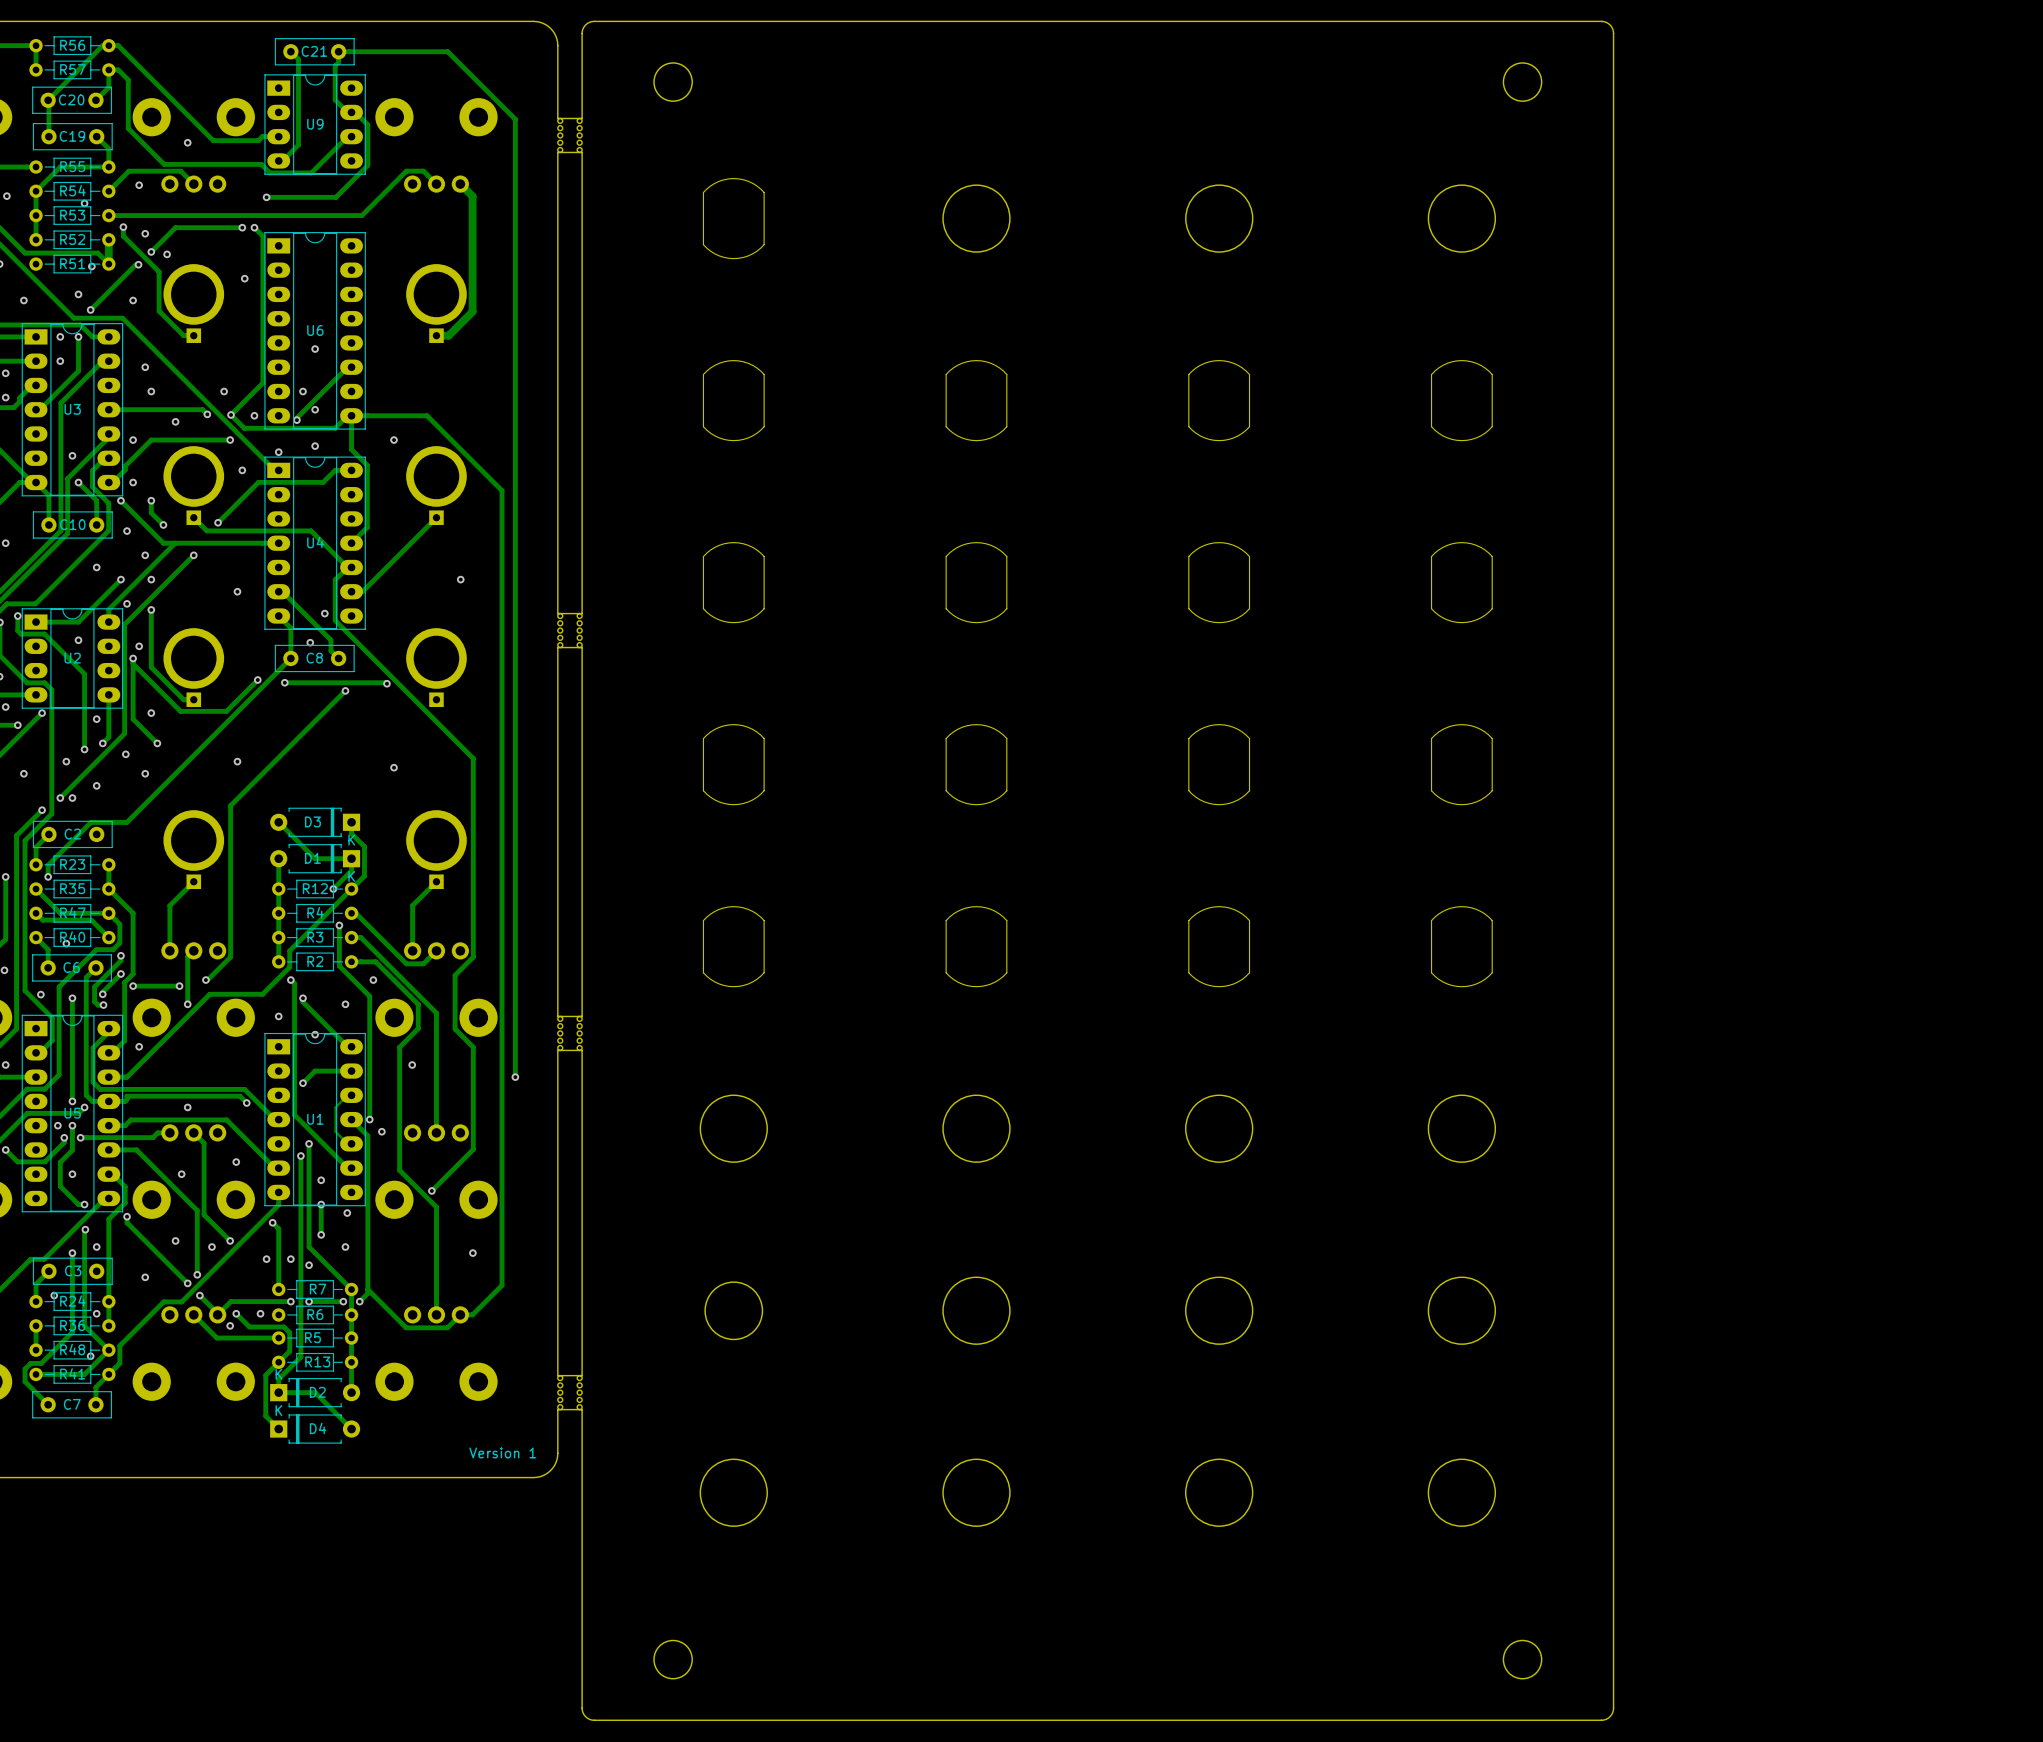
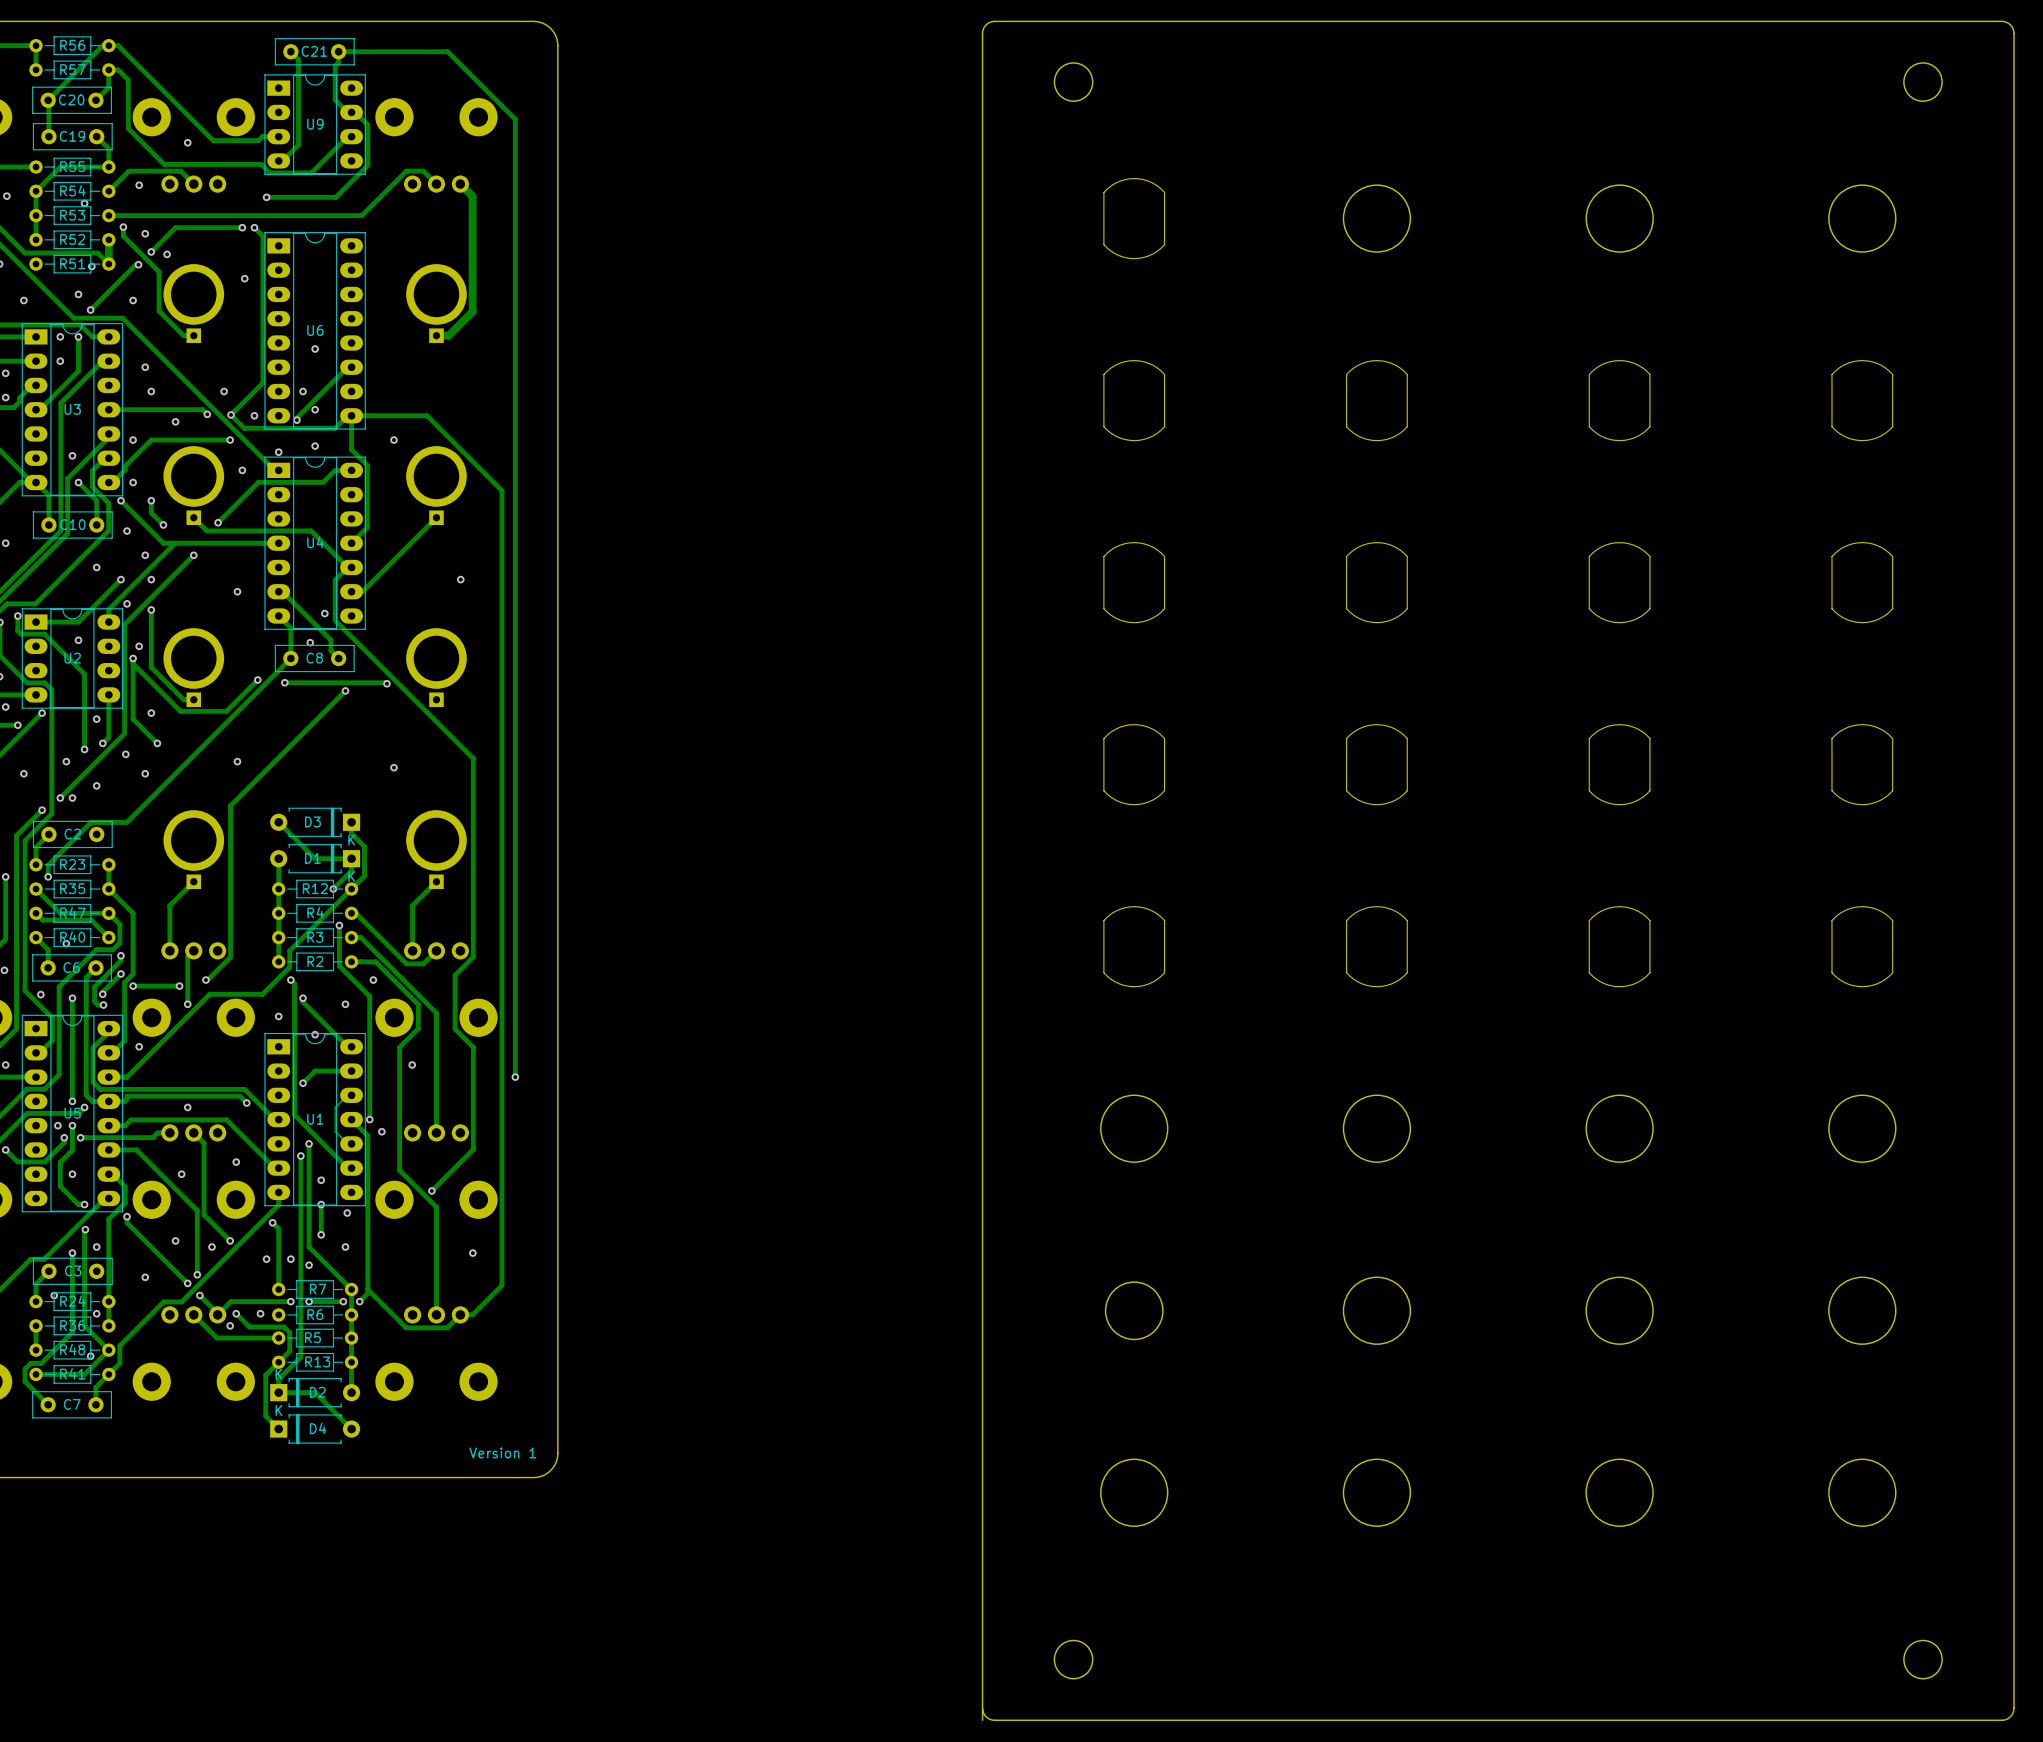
board edge: (994, 21) (591, 21) (584, 26) (582, 31) (582, 118) (557, 118) -> (557, 152) (557, 118)
board edge: none -> (994, 21) (986, 24) (982, 33) (982, 1720)
board edge: (1601, 21) (1610, 24) (1613, 33) (1613, 1708) (1610, 1716) (1601, 1720) -> (1601, 21) (2001, 21) (2010, 24) (2014, 33) (2013, 1711) (2009, 1717) (2001, 1720) (1601, 1720)
round board edge: [653, 62, 693, 102] -> none
round board edge: none -> [1053, 62, 1094, 102]
round board edge: [1502, 62, 1543, 102] -> none
round board edge: none -> [1903, 62, 1943, 102]
round board edge: [557, 117, 564, 125] -> none
round board edge: [576, 117, 583, 125] -> none
round board edge: [557, 125, 564, 132] -> none
round board edge: [576, 125, 583, 132] -> none
round board edge: [557, 132, 564, 139] -> none
round board edge: [576, 132, 583, 139] -> none
round board edge: [557, 139, 564, 146] -> none
round board edge: [576, 139, 583, 146] -> none
round board edge: [557, 146, 564, 154] -> none
round board edge: [576, 146, 583, 154] -> none
board edge: (557, 152) (582, 152) (582, 613) (557, 613) -> none
drawing: [703, 178, 765, 259] -> none
drawing: none -> [1103, 178, 1165, 259]
round board edge: [942, 184, 1011, 253] -> none
round board edge: [1185, 184, 1254, 253] -> none
round board edge: none -> [1342, 184, 1412, 253]
round board edge: [1427, 184, 1497, 253] -> none
round board edge: none -> [1585, 184, 1654, 253]
round board edge: none -> [1828, 184, 1897, 253]
drawing: [703, 360, 765, 441] -> none
drawing: [946, 360, 1007, 441] -> none
drawing: none -> [1103, 360, 1165, 441]
drawing: [1188, 360, 1250, 441] -> none
drawing: none -> [1346, 360, 1408, 441]
drawing: [1431, 360, 1493, 441] -> none
drawing: none -> [1589, 360, 1651, 441]
drawing: none -> [1831, 360, 1893, 441]
drawing: [703, 542, 765, 623] -> none
drawing: [946, 542, 1007, 623] -> none
drawing: none -> [1103, 542, 1165, 623]
drawing: [1188, 542, 1250, 623] -> none
drawing: none -> [1346, 542, 1408, 623]
drawing: [1431, 542, 1493, 623] -> none
drawing: none -> [1589, 542, 1651, 623]
drawing: none -> [1831, 542, 1893, 623]
round board edge: [557, 612, 564, 620] -> none
round board edge: [576, 612, 583, 620] -> none
round board edge: [557, 620, 564, 627] -> none
round board edge: [576, 620, 583, 627] -> none
round board edge: [557, 627, 564, 634] -> none
round board edge: [576, 627, 583, 634] -> none
round board edge: [557, 634, 564, 641] -> none
round board edge: [576, 634, 583, 641] -> none
round board edge: [557, 641, 564, 649] -> none
round board edge: [576, 641, 583, 649] -> none
board edge: (557, 647) (582, 647) (582, 1016) (557, 1016) -> (557, 647) (557, 613)
drawing: [703, 724, 765, 805] -> none
drawing: [946, 724, 1007, 805] -> none
drawing: none -> [1103, 724, 1165, 805]
drawing: [1188, 724, 1250, 805] -> none
drawing: none -> [1346, 724, 1408, 805]
drawing: [1431, 724, 1493, 805] -> none
drawing: none -> [1589, 724, 1651, 805]
drawing: none -> [1831, 724, 1893, 805]
drawing: [703, 906, 765, 987] -> none
drawing: [946, 906, 1007, 987] -> none
drawing: none -> [1103, 906, 1165, 987]
drawing: [1188, 906, 1250, 987] -> none
drawing: none -> [1346, 906, 1408, 987]
drawing: [1431, 906, 1493, 987] -> none
drawing: none -> [1589, 906, 1651, 987]
drawing: none -> [1831, 906, 1893, 987]
round board edge: [557, 1015, 564, 1023] -> none
round board edge: [576, 1015, 583, 1023] -> none
round board edge: [557, 1023, 564, 1030] -> none
round board edge: [576, 1023, 583, 1030] -> none
round board edge: [557, 1030, 564, 1037] -> none
round board edge: [576, 1030, 583, 1037] -> none
round board edge: [557, 1037, 564, 1044] -> none
round board edge: [576, 1037, 583, 1044] -> none
round board edge: [557, 1044, 564, 1052] -> none
round board edge: [576, 1044, 583, 1052] -> none
board edge: (557, 1050) (582, 1050) (582, 1375) (557, 1375) -> (557, 1050) (557, 1016)
round board edge: [699, 1094, 768, 1163] -> none
round board edge: [942, 1094, 1011, 1163] -> none
round board edge: none -> [1100, 1094, 1169, 1163]
round board edge: [1185, 1094, 1254, 1163] -> none
round board edge: none -> [1342, 1094, 1412, 1163]
round board edge: [1427, 1094, 1497, 1163] -> none
round board edge: none -> [1585, 1094, 1654, 1163]
round board edge: none -> [1828, 1094, 1897, 1163]
round board edge: [942, 1276, 1011, 1345] -> none
round board edge: [1185, 1276, 1254, 1345] -> none
round board edge: none -> [1342, 1276, 1412, 1345]
round board edge: [1427, 1276, 1497, 1345] -> none
round board edge: none -> [1585, 1276, 1654, 1345]
round board edge: none -> [1828, 1276, 1897, 1345]
round board edge: [704, 1281, 764, 1341] -> none
round board edge: none -> [1104, 1281, 1164, 1341]
round board edge: [557, 1374, 564, 1382] -> none
round board edge: [576, 1374, 583, 1382] -> none
board edge: none -> (557, 1375) (557, 1409)
round board edge: [557, 1382, 564, 1389] -> none
round board edge: [576, 1382, 583, 1389] -> none
round board edge: [557, 1389, 564, 1396] -> none
round board edge: [576, 1389, 583, 1396] -> none
round board edge: [557, 1396, 564, 1404] -> none
round board edge: [576, 1396, 583, 1404] -> none
round board edge: [557, 1404, 564, 1411] -> none
round board edge: [576, 1404, 583, 1411] -> none
board edge: (557, 1409) (582, 1409) (582, 1708) (586, 1717) (594, 1720) (994, 1720) -> (982, 1708) (986, 1716) (994, 1720)
round board edge: [699, 1458, 768, 1527] -> none
round board edge: [942, 1458, 1011, 1527] -> none
round board edge: none -> [1100, 1458, 1169, 1527]
round board edge: [1185, 1458, 1254, 1527] -> none
round board edge: none -> [1342, 1458, 1412, 1527]
round board edge: [1427, 1458, 1497, 1527] -> none
round board edge: none -> [1585, 1458, 1654, 1527]
round board edge: none -> [1828, 1458, 1897, 1527]
round board edge: [653, 1639, 693, 1680] -> none
round board edge: none -> [1053, 1639, 1094, 1680]
round board edge: [1502, 1639, 1543, 1680] -> none
round board edge: none -> [1903, 1639, 1943, 1680]

